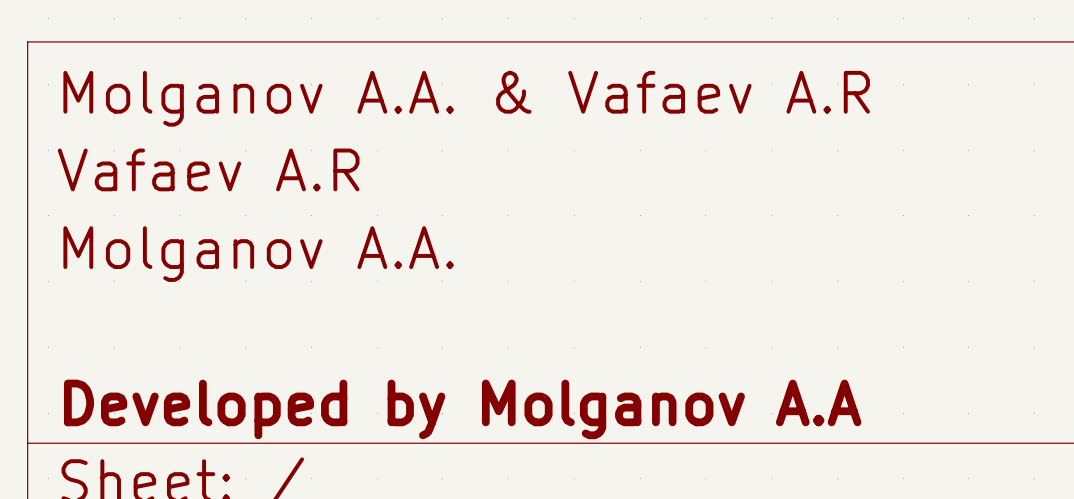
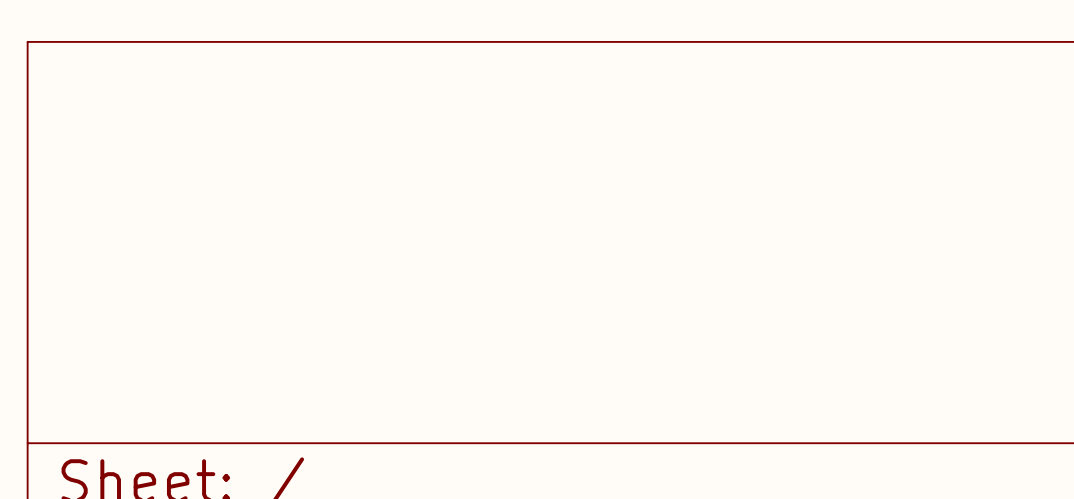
title block: Molganov A.A. & Vafaev A.R (466, 98) -> none
title block: Vafaev A.R (208, 169) -> none
title block: Molganov A.A. (258, 254) -> none
title block: Developed by Molganov A.A (462, 409) -> none

